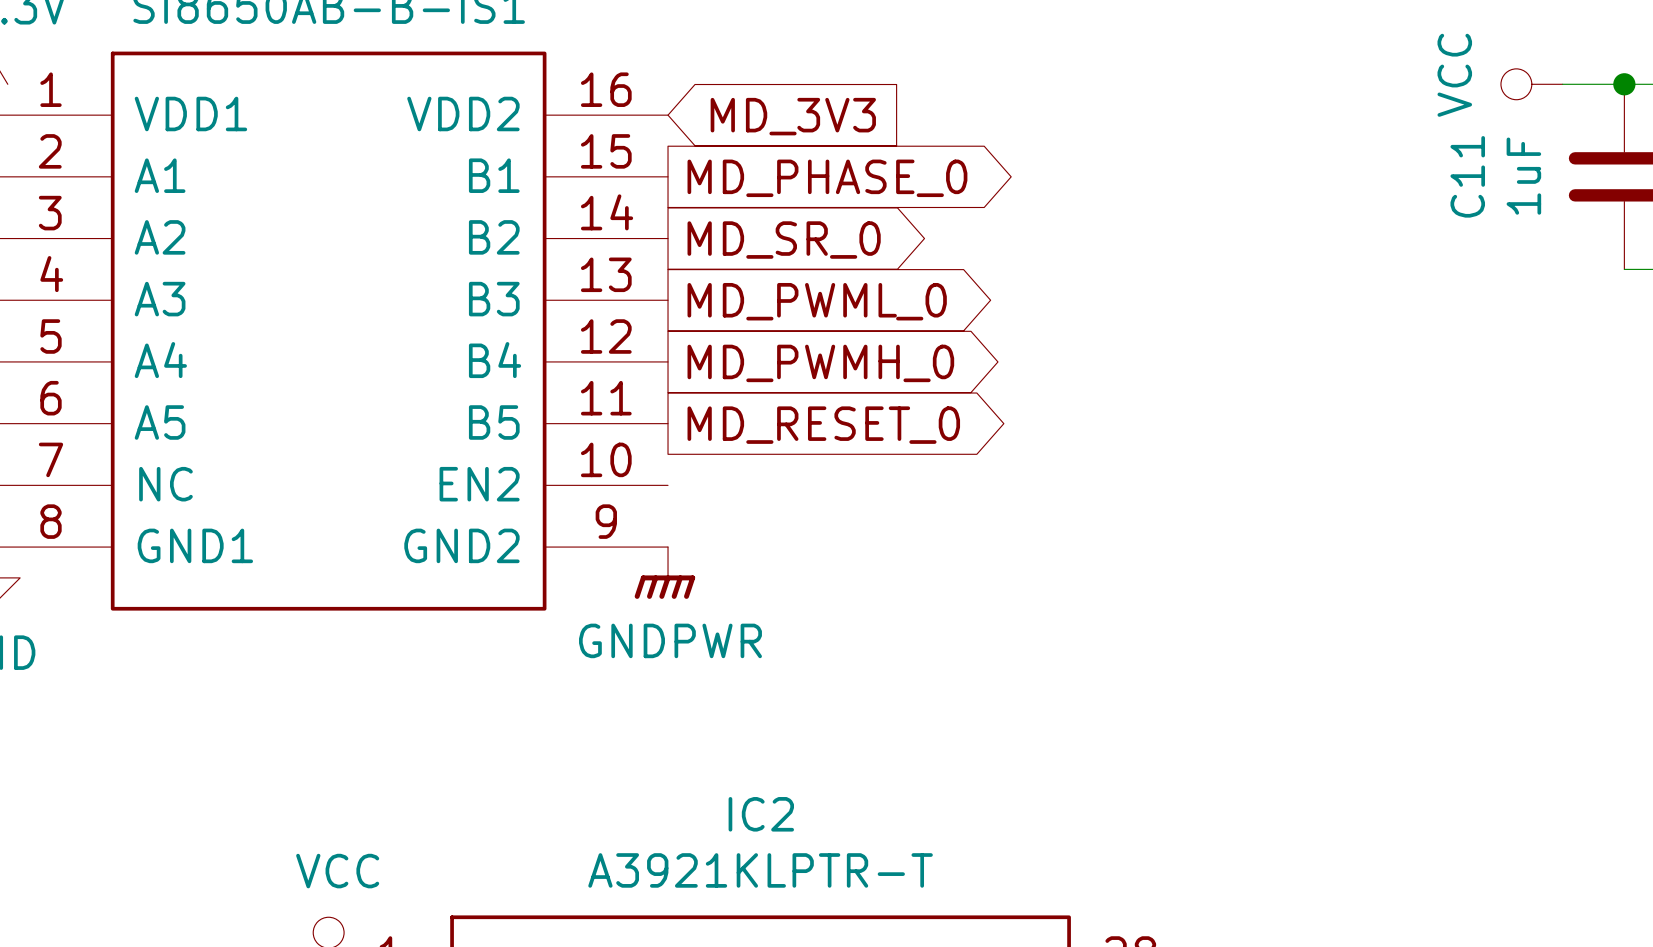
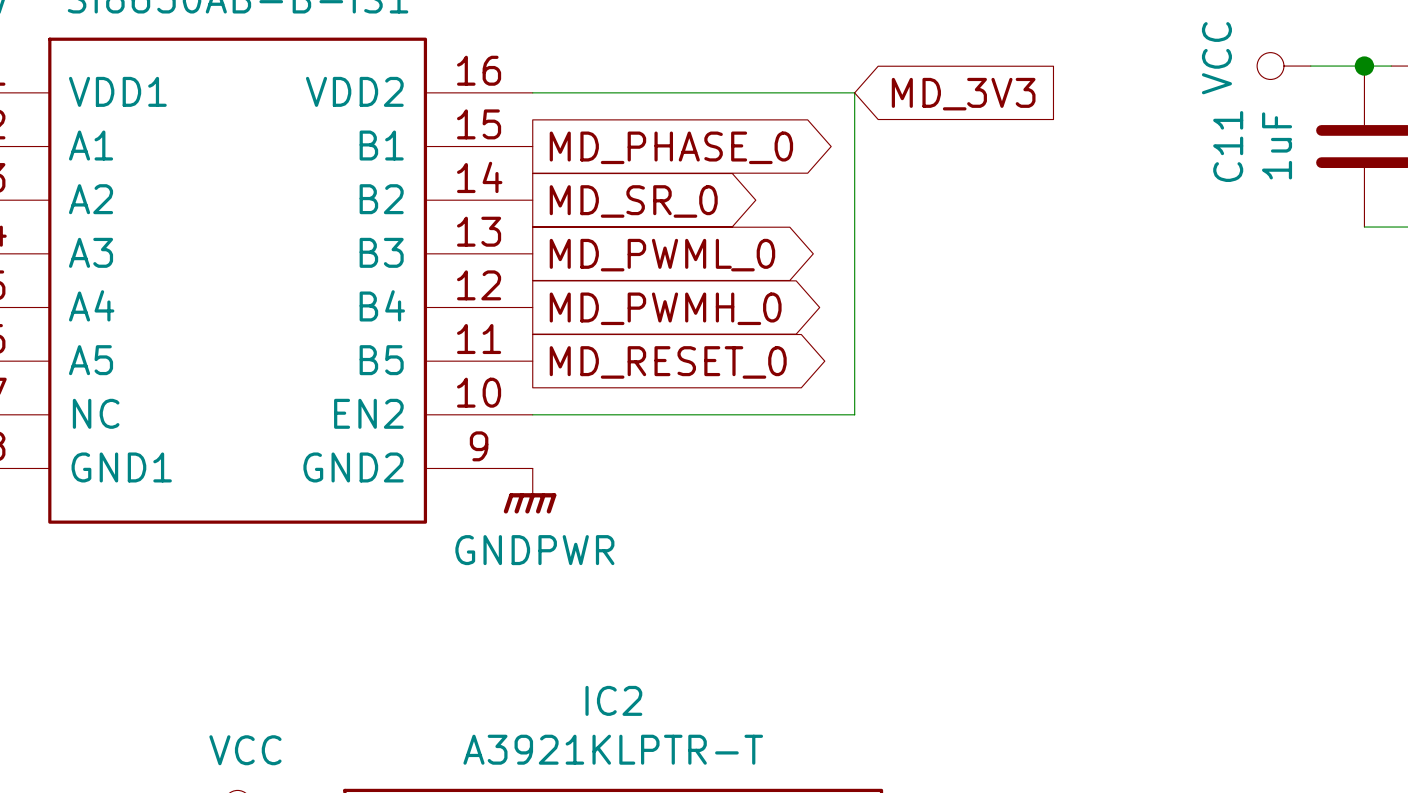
wire: none -> (532, 92) (854, 92) (854, 414) (532, 414)
global label position: MD_3V3 (793, 116) -> MD_3V3 (963, 94)

